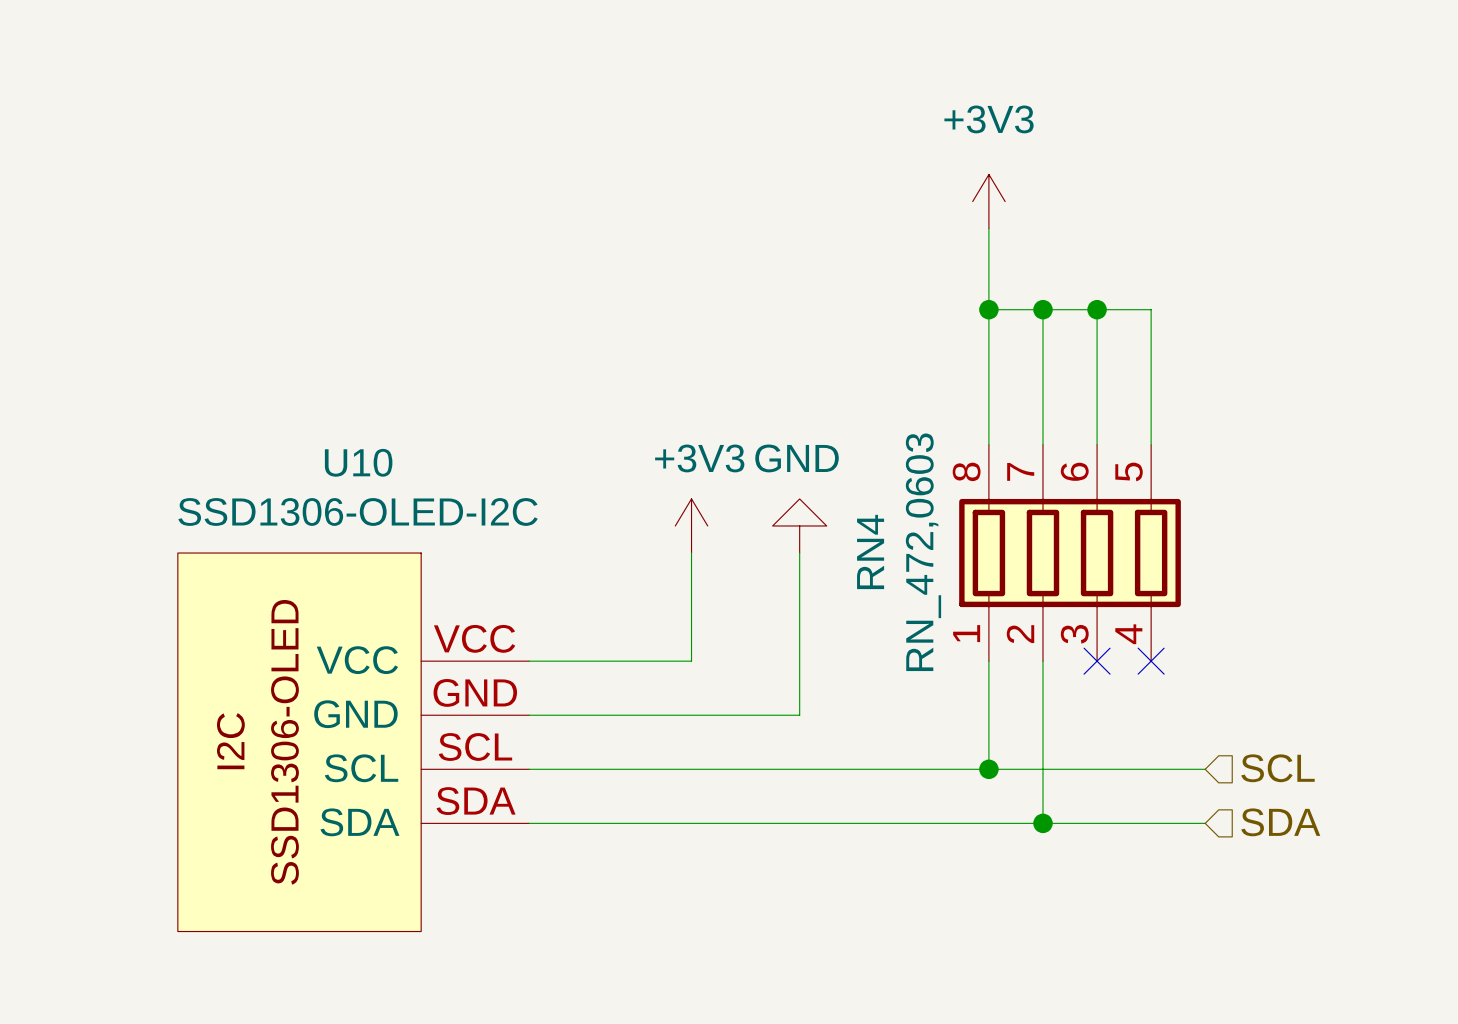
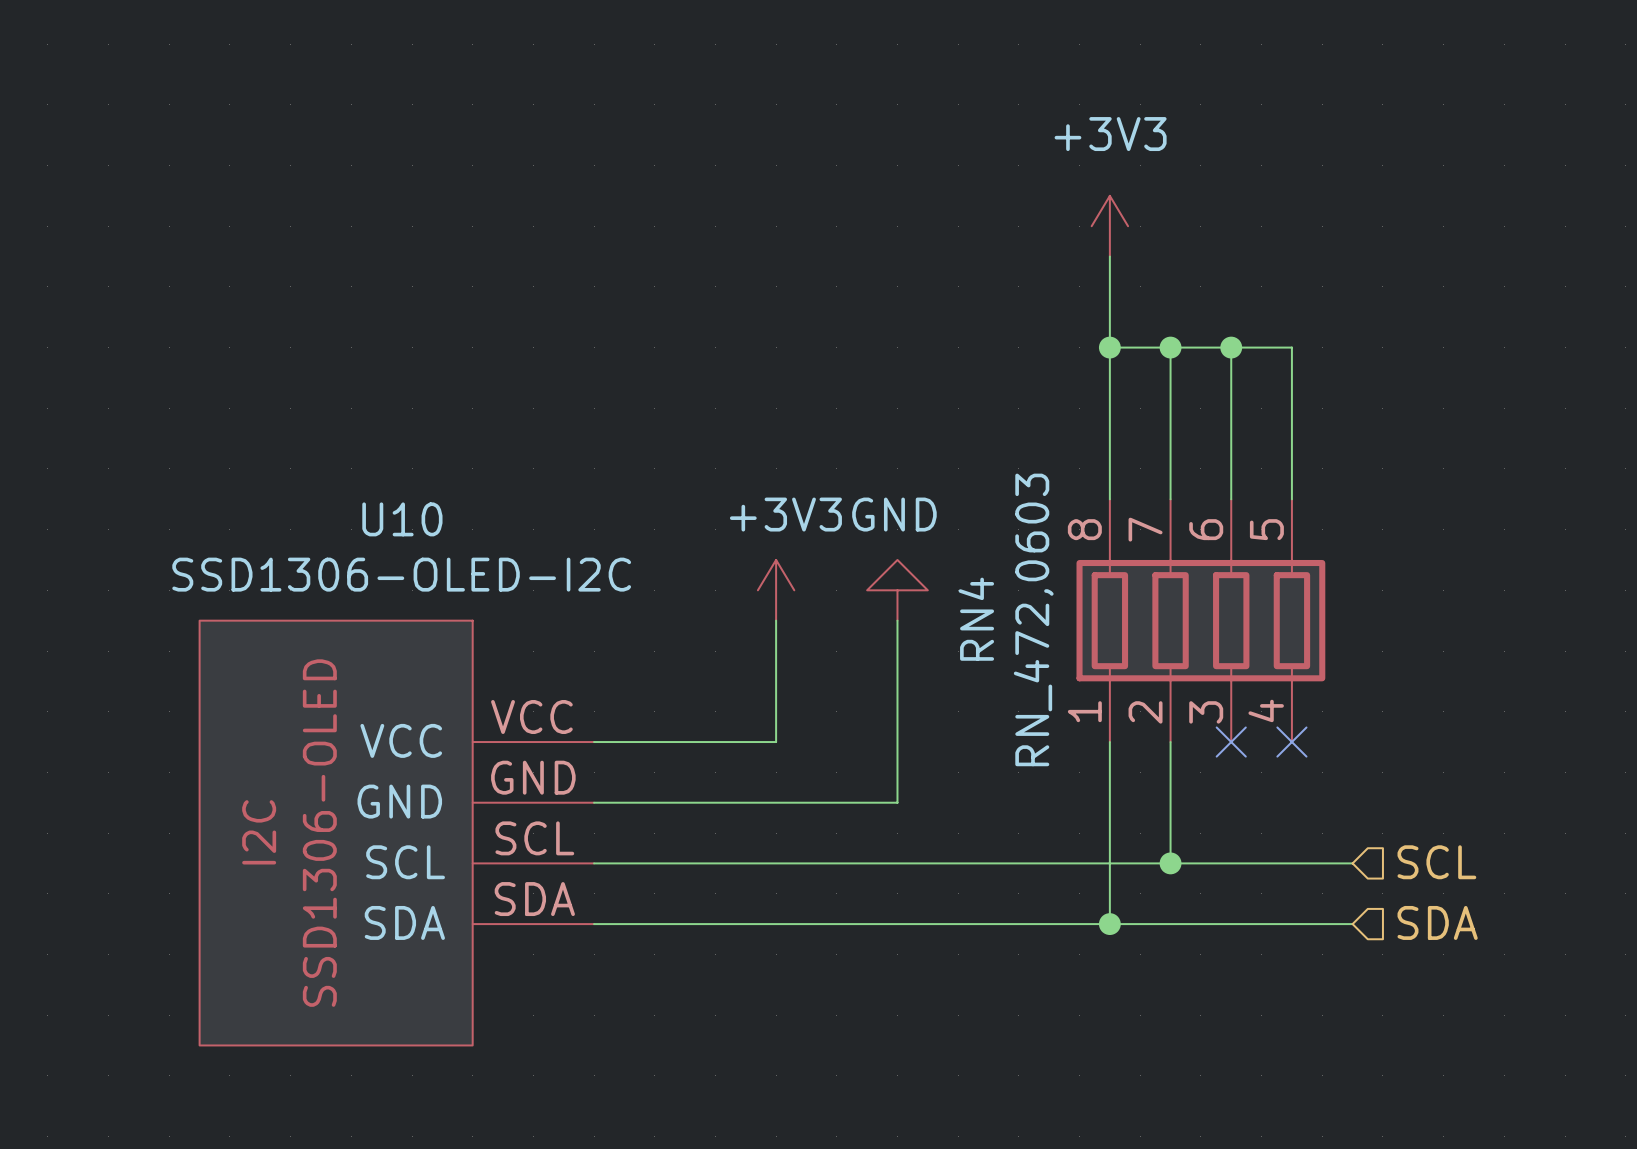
junction: (988, 769) -> none
wire: (1042, 769) (1042, 823) -> (1109, 863) (1109, 924)
junction: none -> (1170, 863)
junction: none -> (1109, 924)
junction: (1042, 823) -> none

